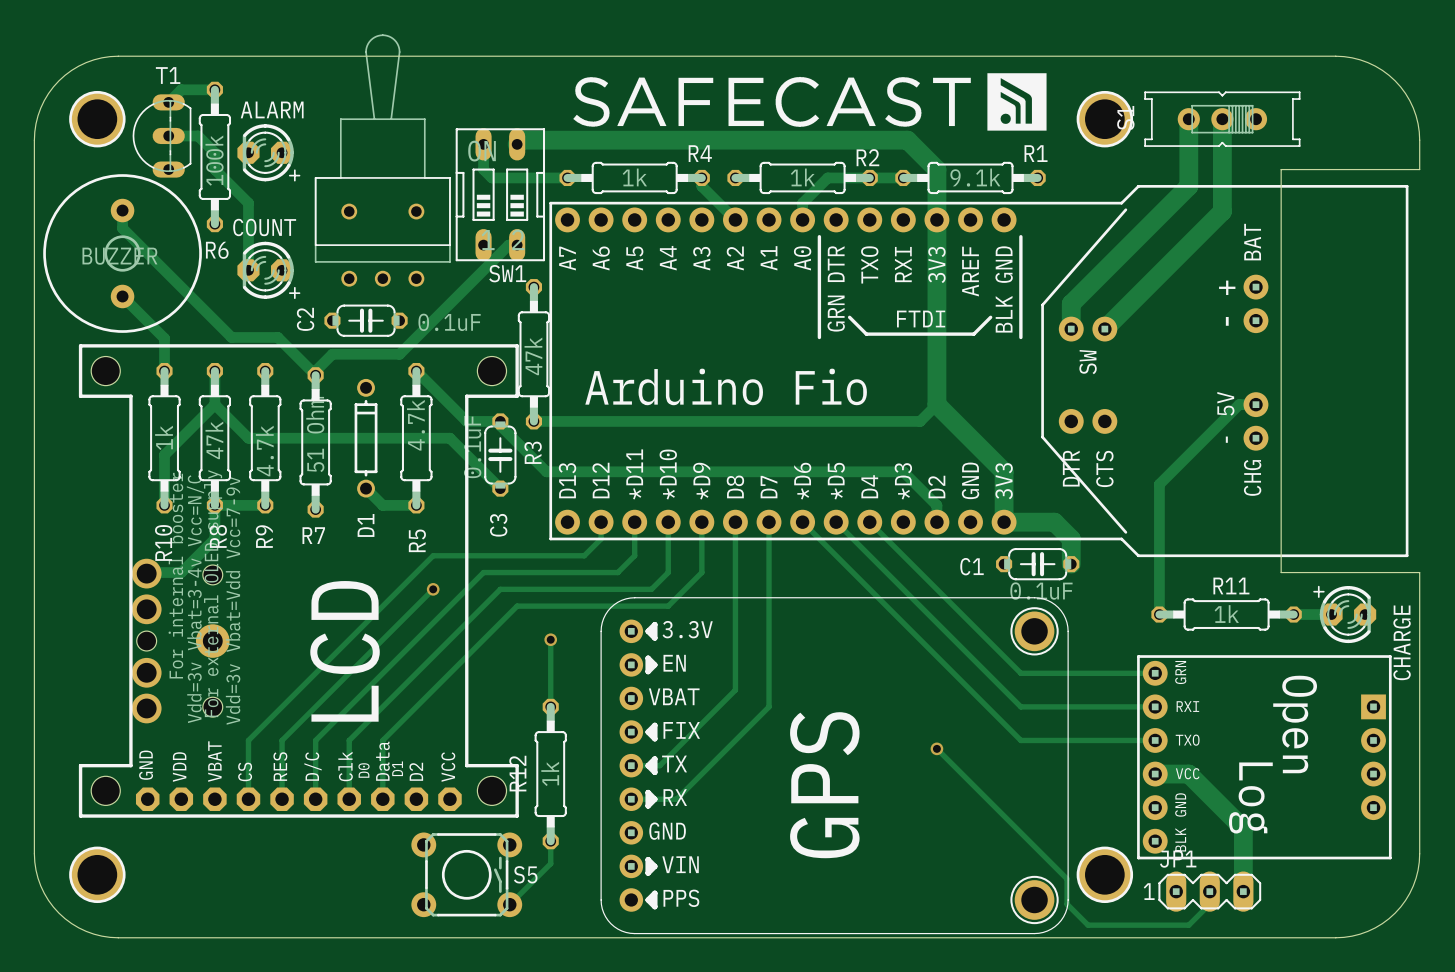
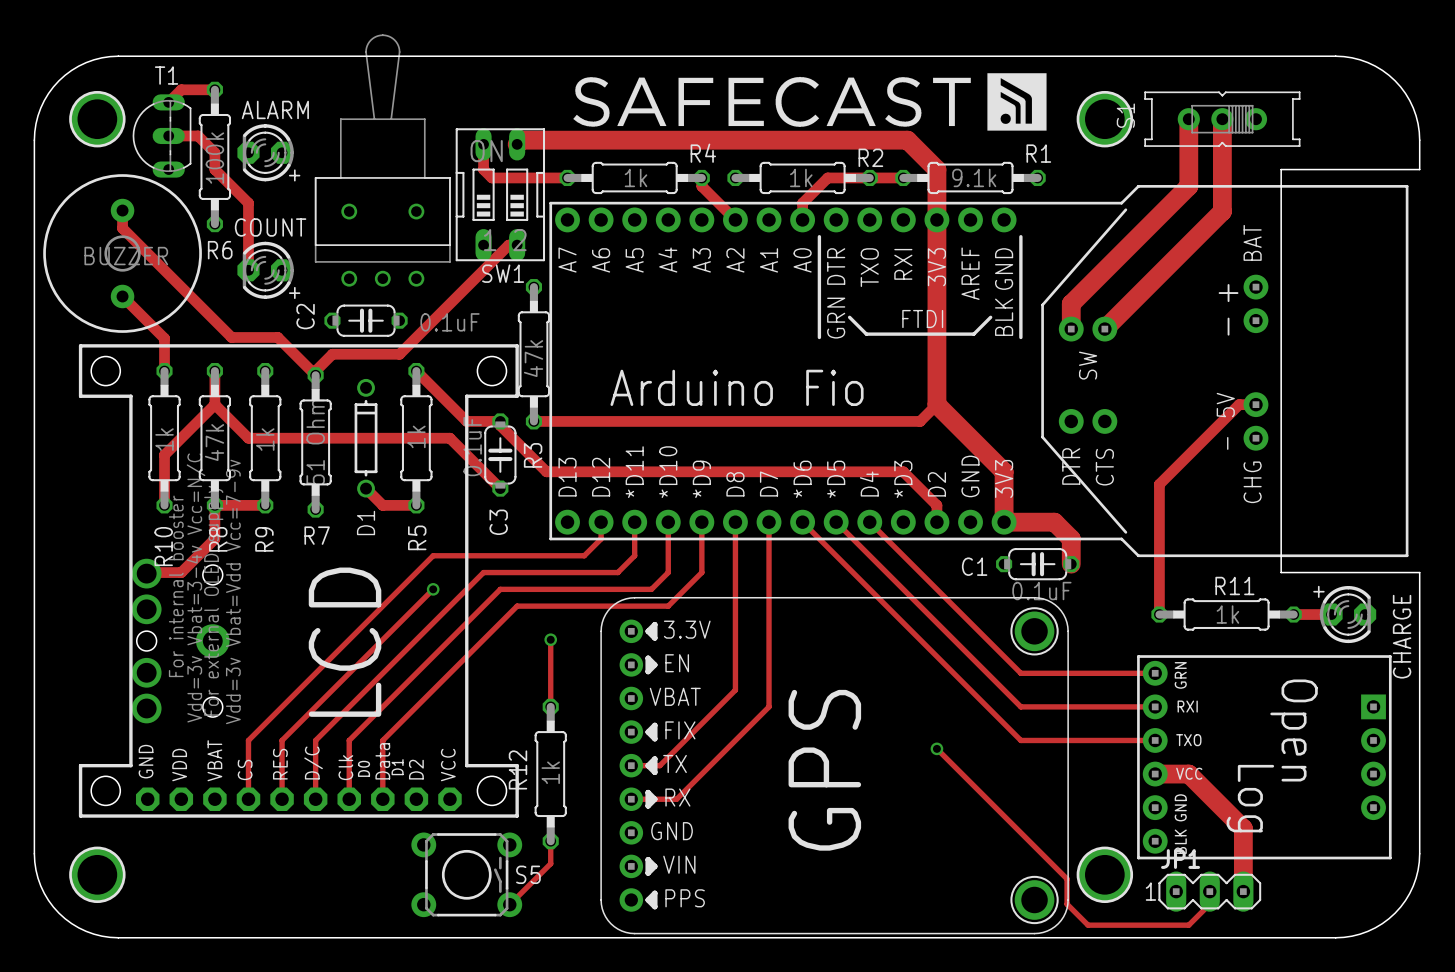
R5 value: 4.7k (416, 425) -> 1k (416, 436)
R9 value: 4.7k (264, 451) -> 1k (265, 439)

